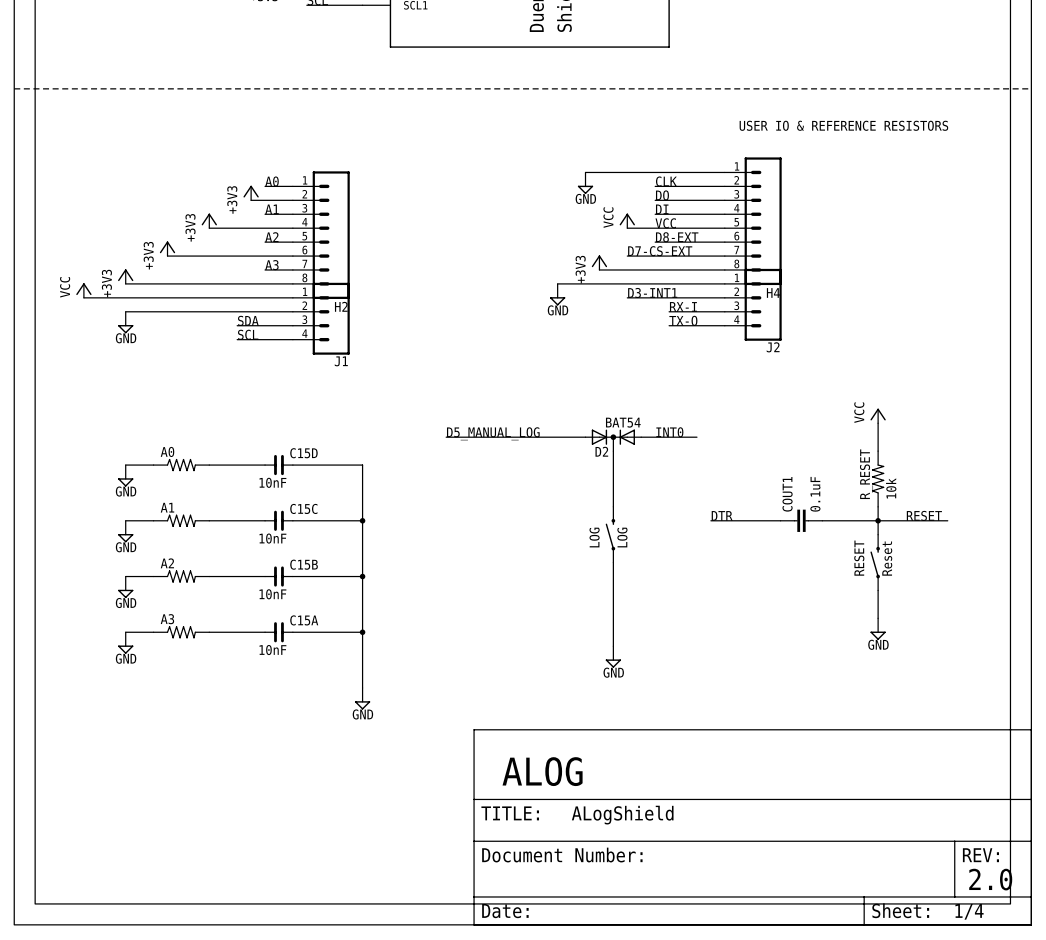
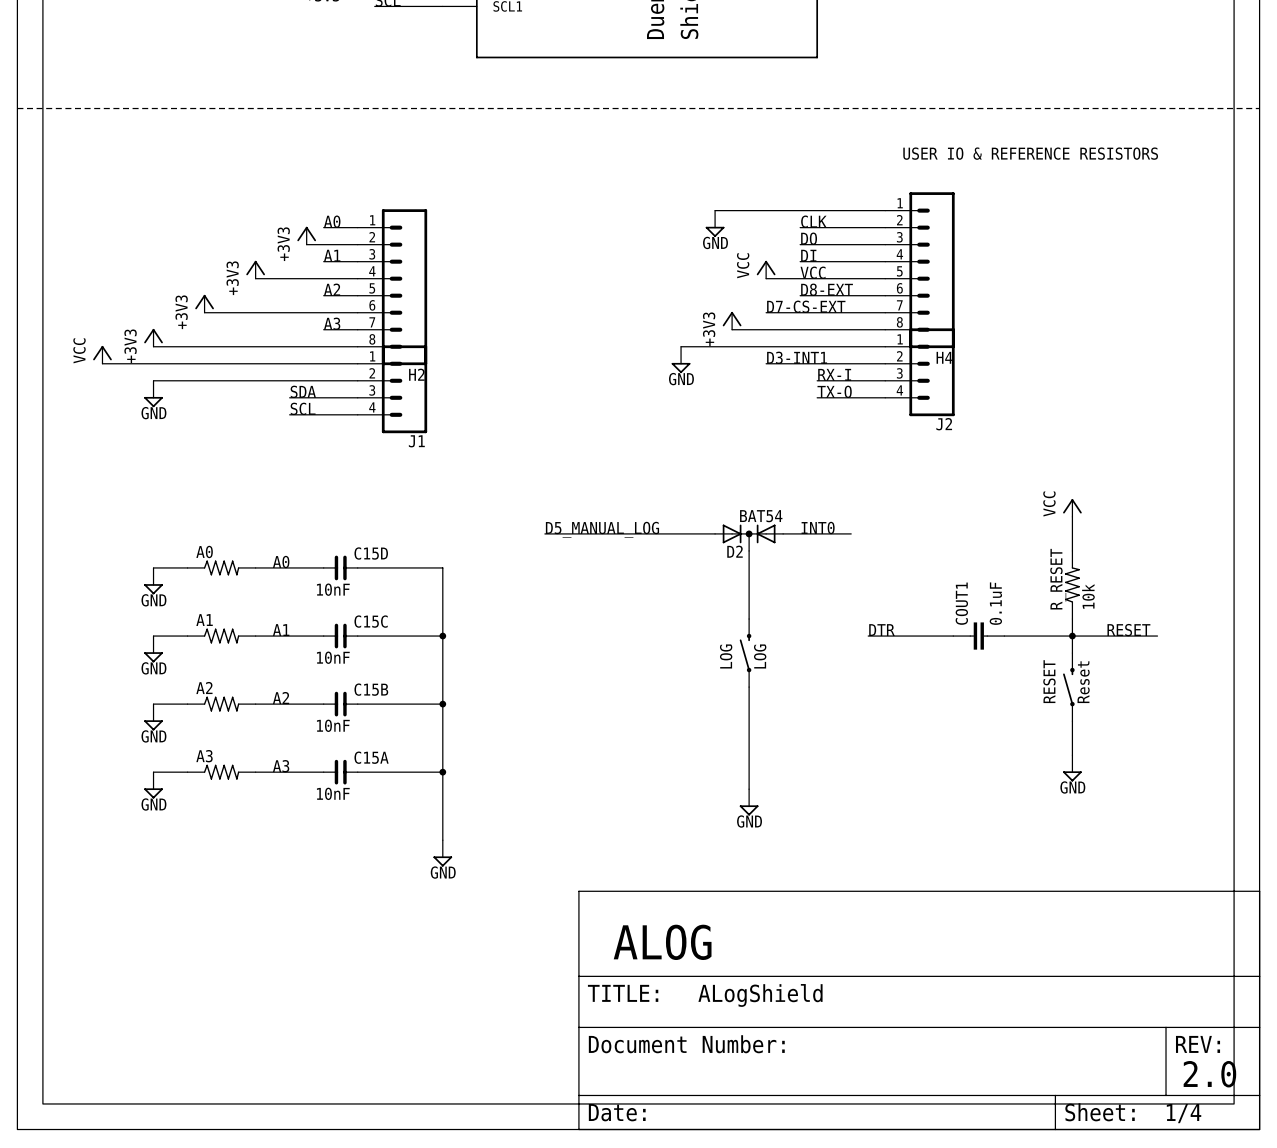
label: none -> A0 (281, 562)
label: none -> A1 (281, 630)
label: none -> A2 (281, 698)
label: none -> A3 (281, 766)

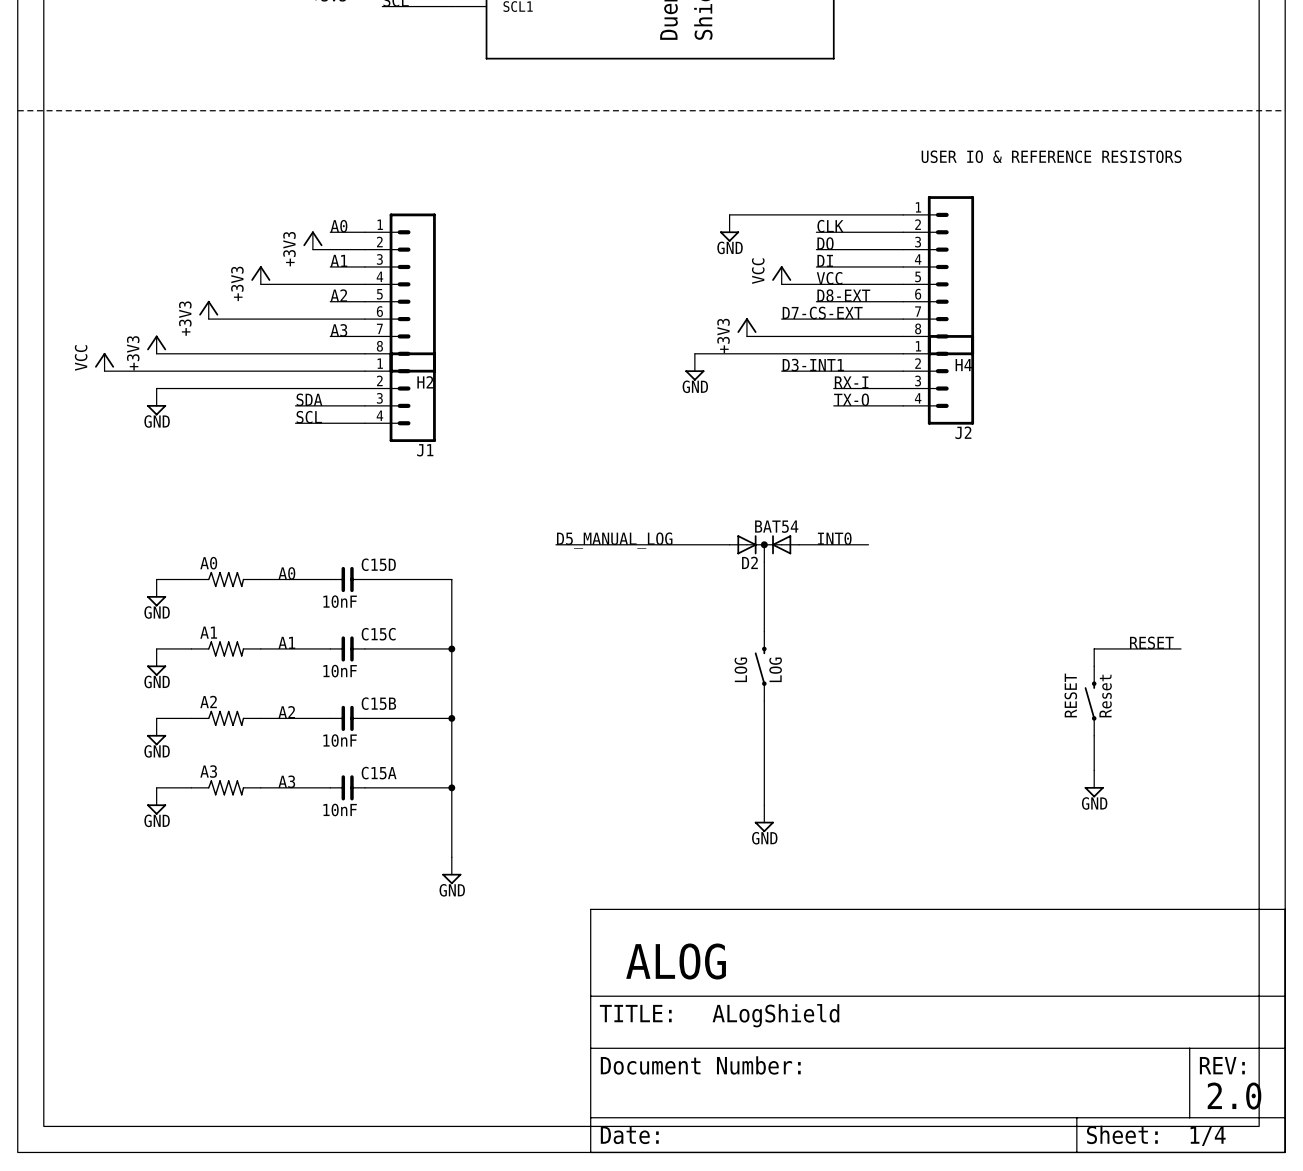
power symbol: VCC (1072, 507) -> none
wire: (1072, 516) (1072, 550) -> none
R_RESET: 10k (1072, 584) -> none
wire: (1072, 619) (1072, 636) (1004, 636) -> none
label: DTR (881, 630) -> none
wire: (868, 636) (953, 636) -> none
COUT1: 0.1uF (978, 636) -> none
junction: (1072, 636) -> none

